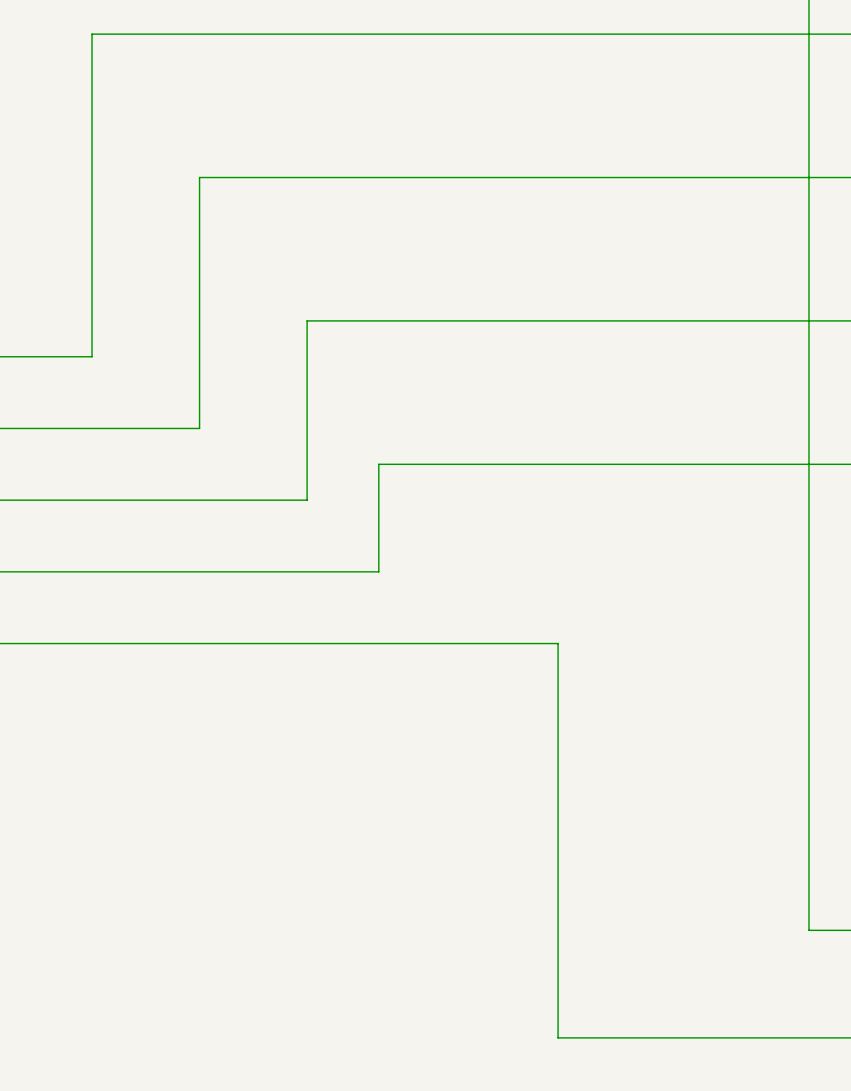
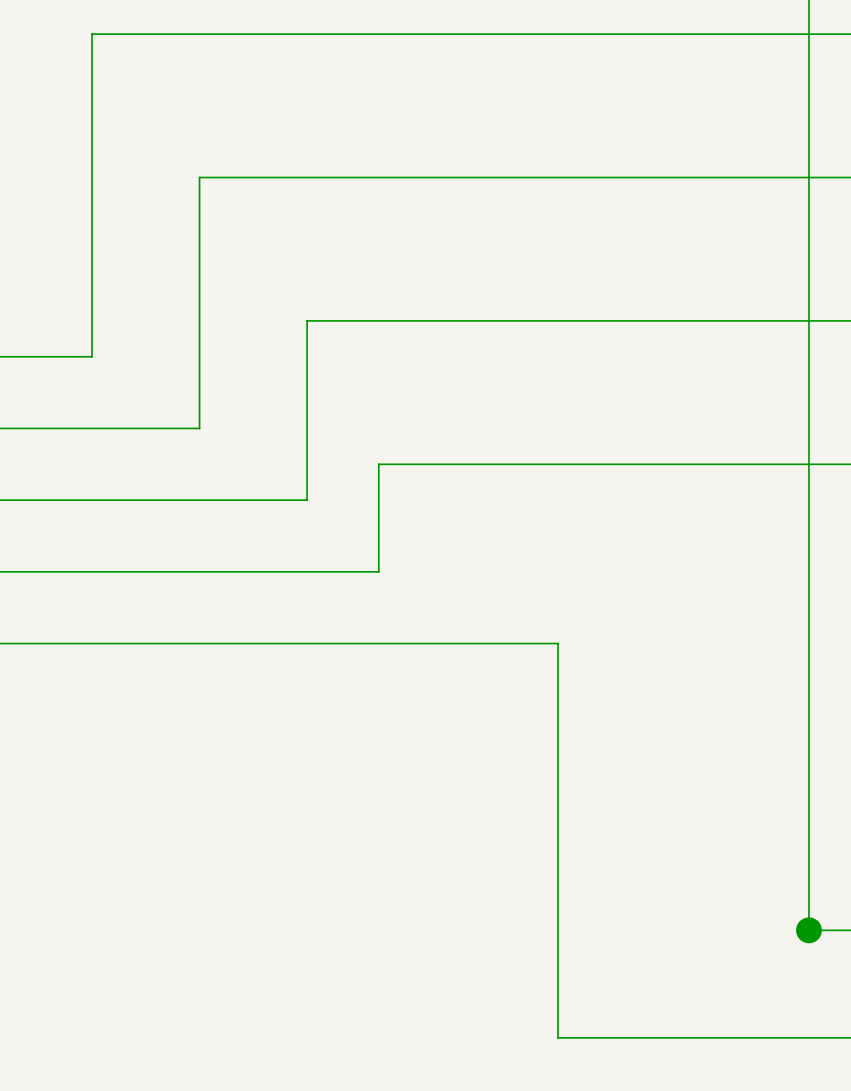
junction: none -> (808, 930)

